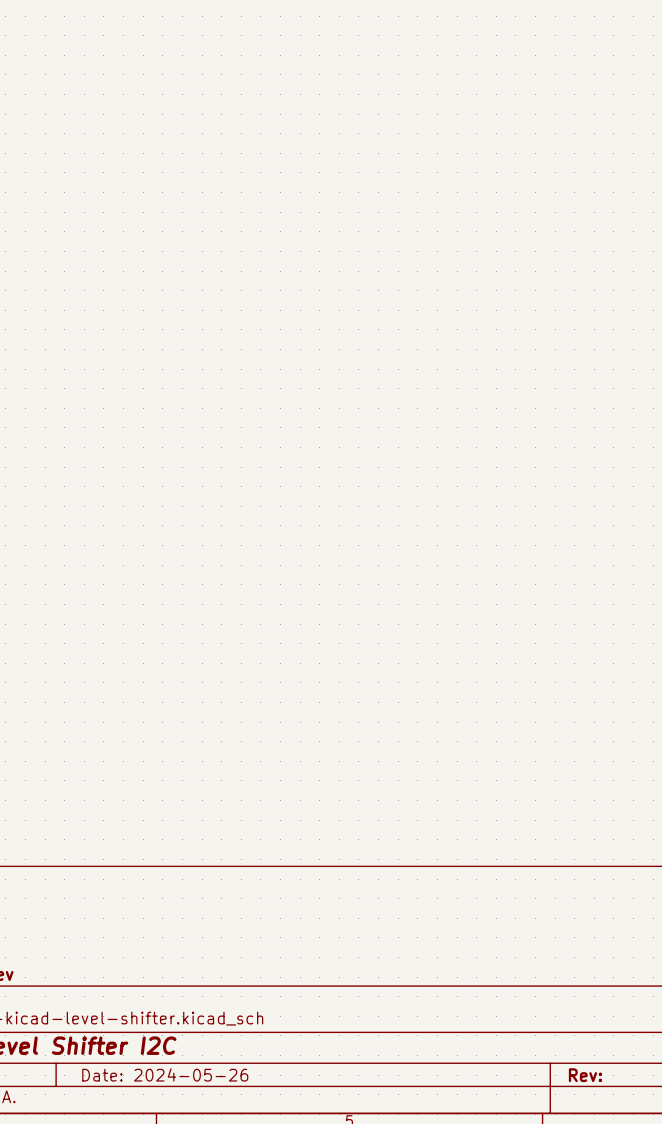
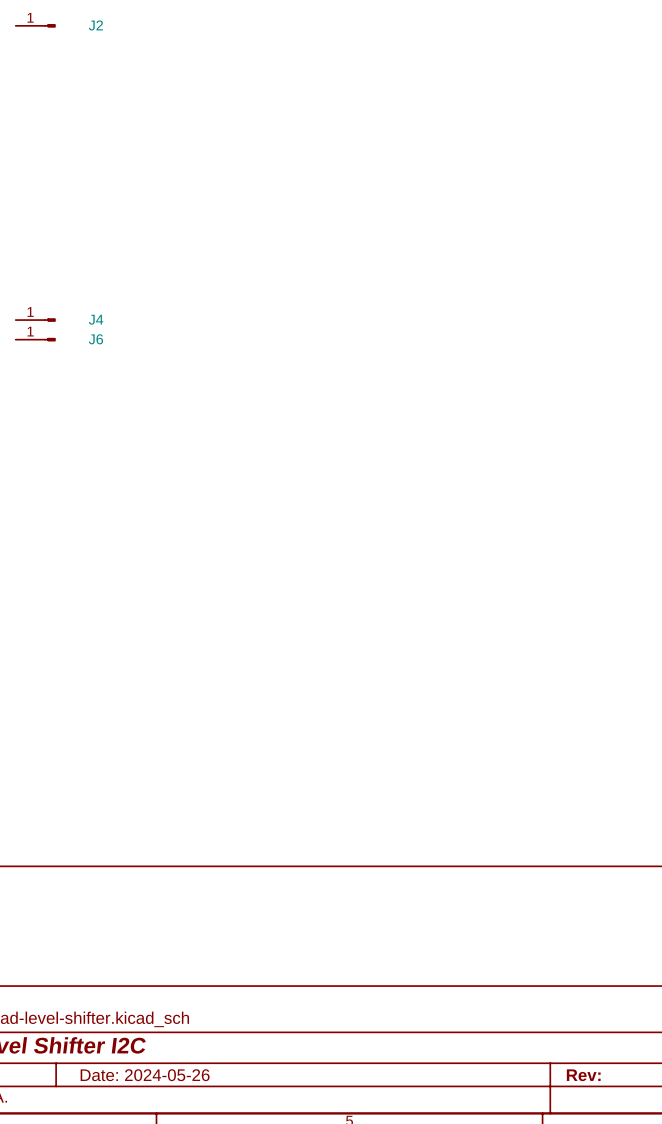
J2: none -> (35, 25)
J4: none -> (35, 320)
J6: none -> (35, 339)

